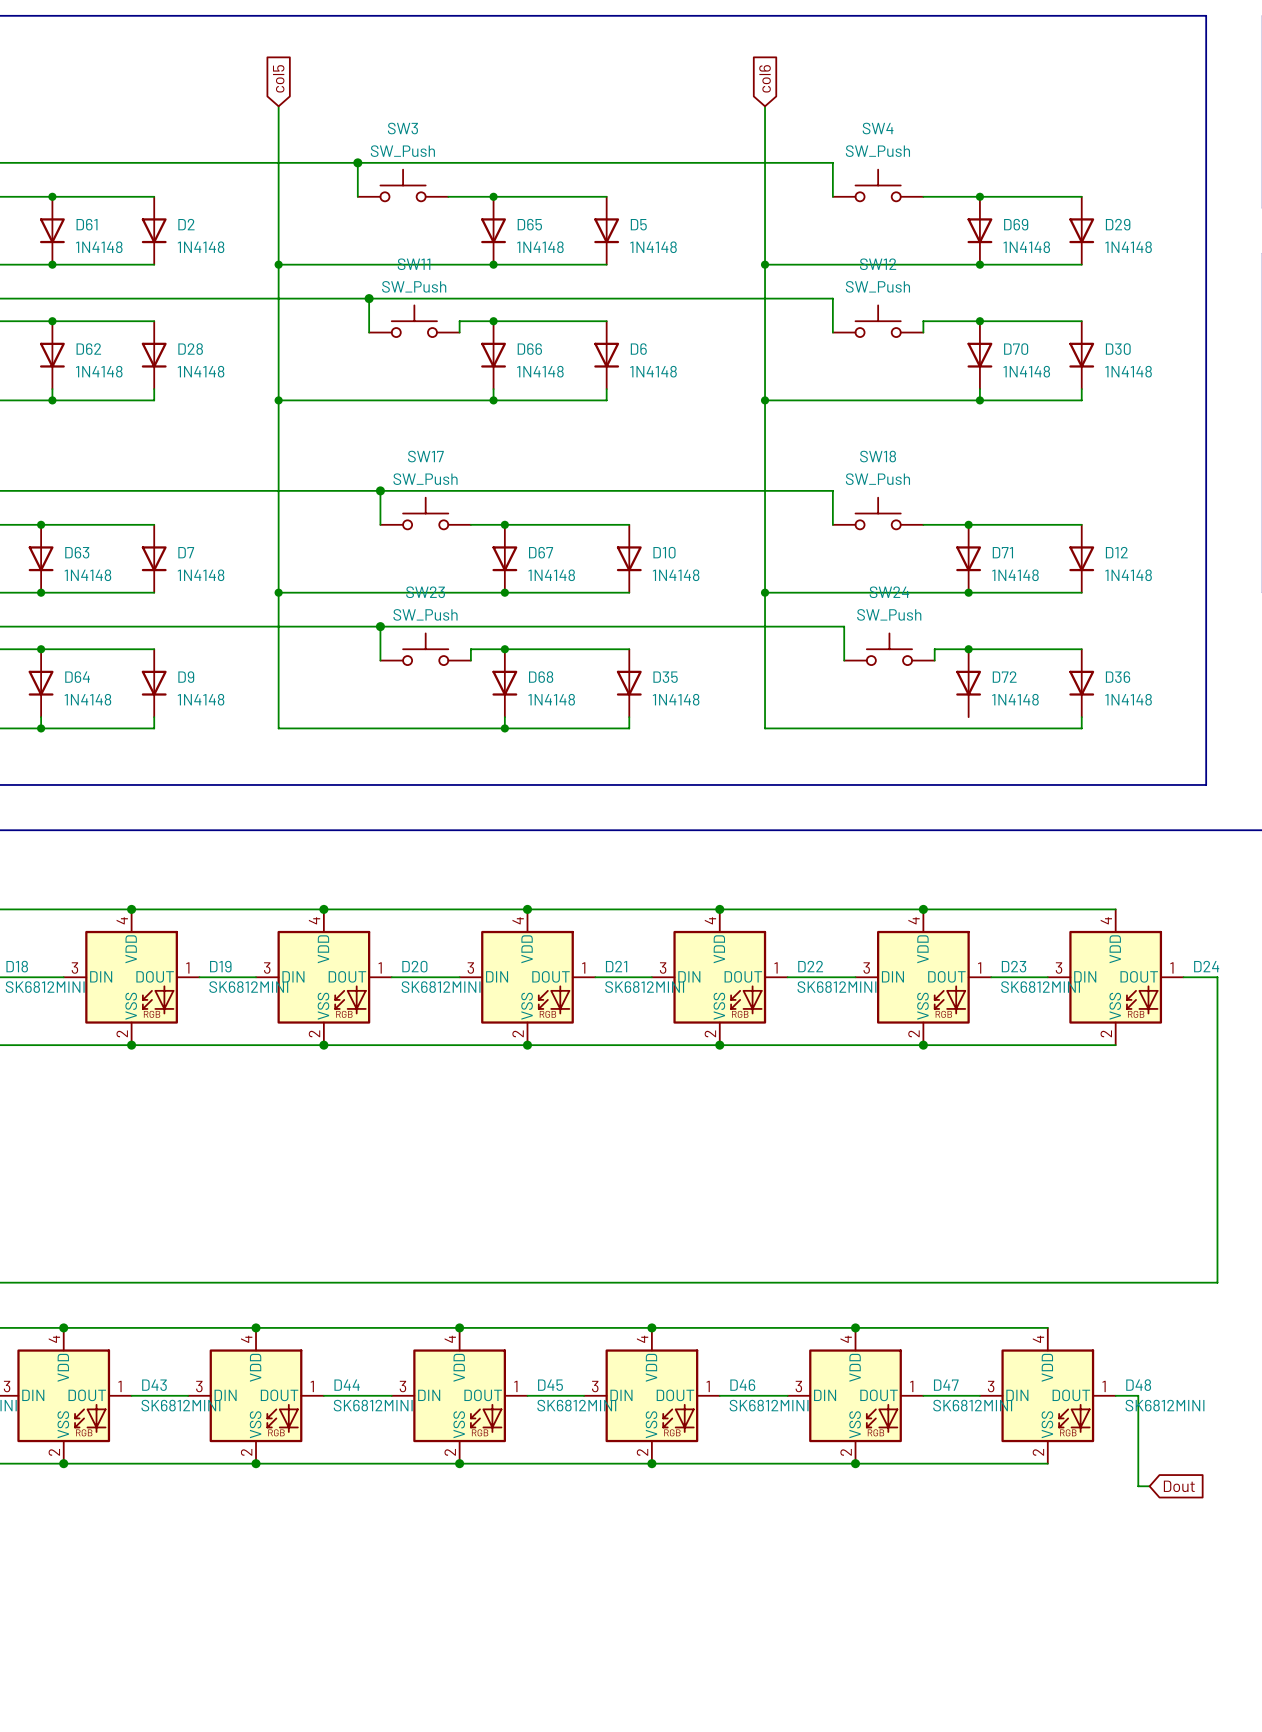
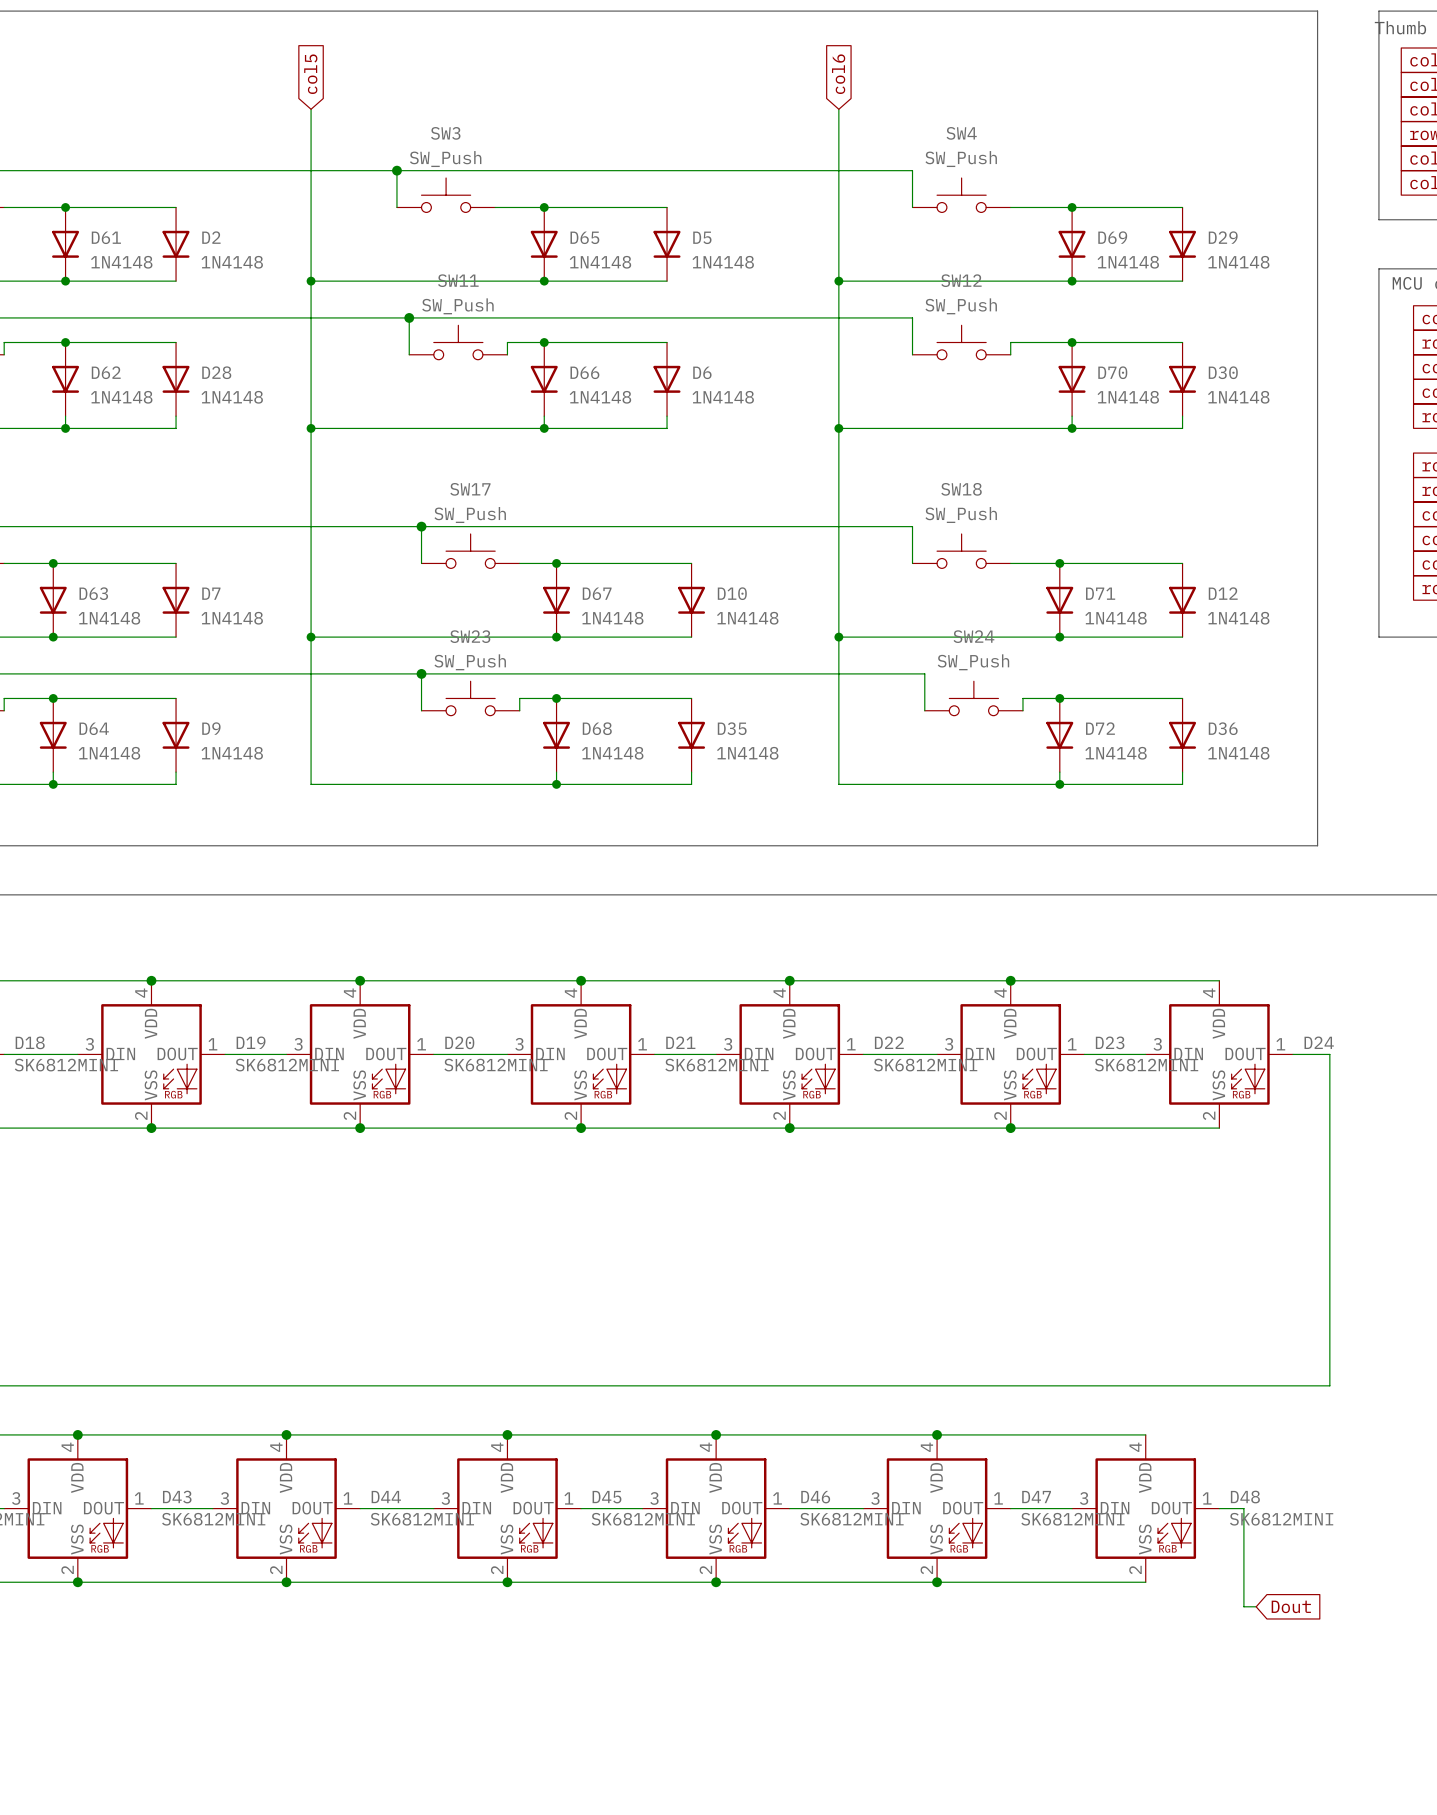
wire: none -> (1059, 772) (1059, 784)
junction: none -> (1059, 784)

